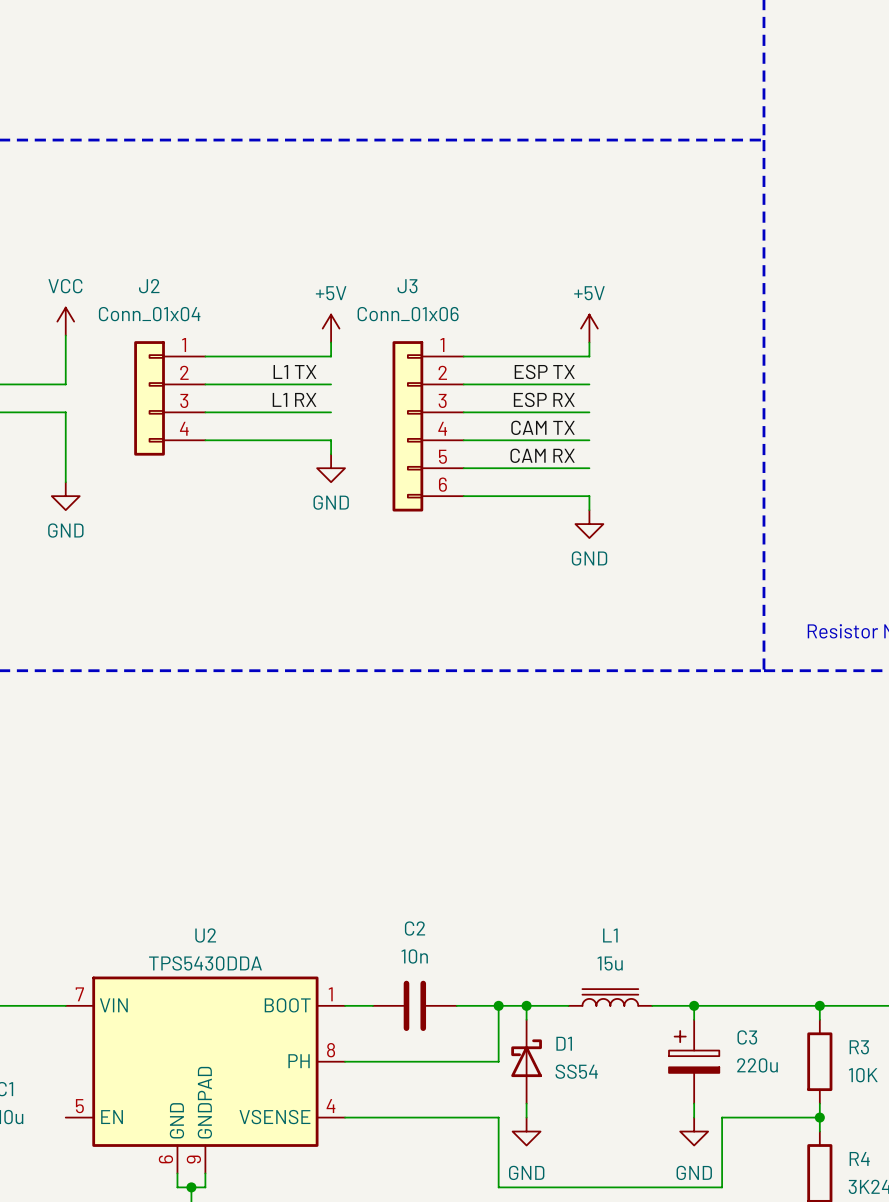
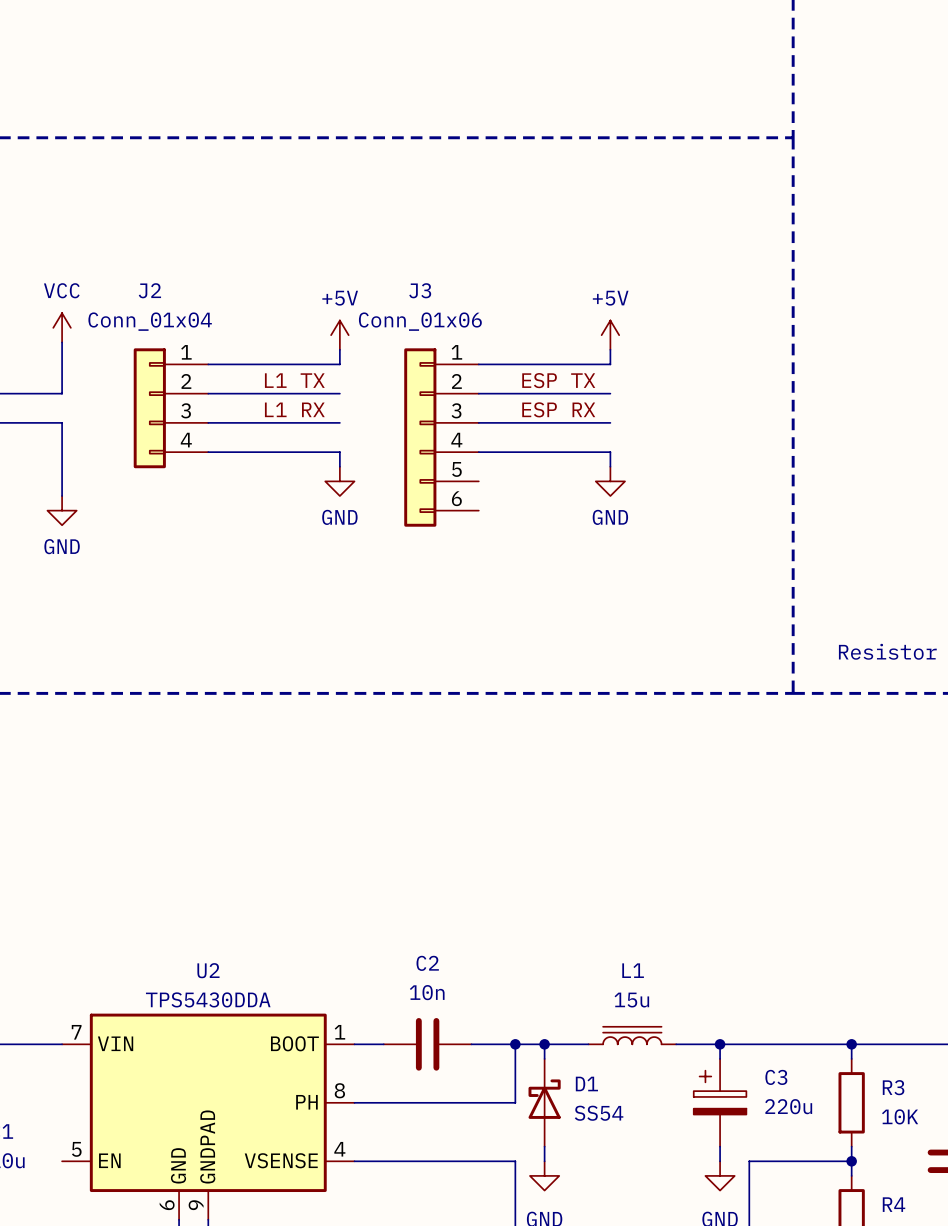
label: CAM TX (543, 427) -> none
wire: none -> (610, 452) (610, 466)
label: CAM RX (542, 455) -> none
wire: (463, 468) (589, 468) -> none
wire: (463, 496) (589, 496) (589, 510) -> none
power symbol position: GND (589, 524) -> GND (610, 481)

